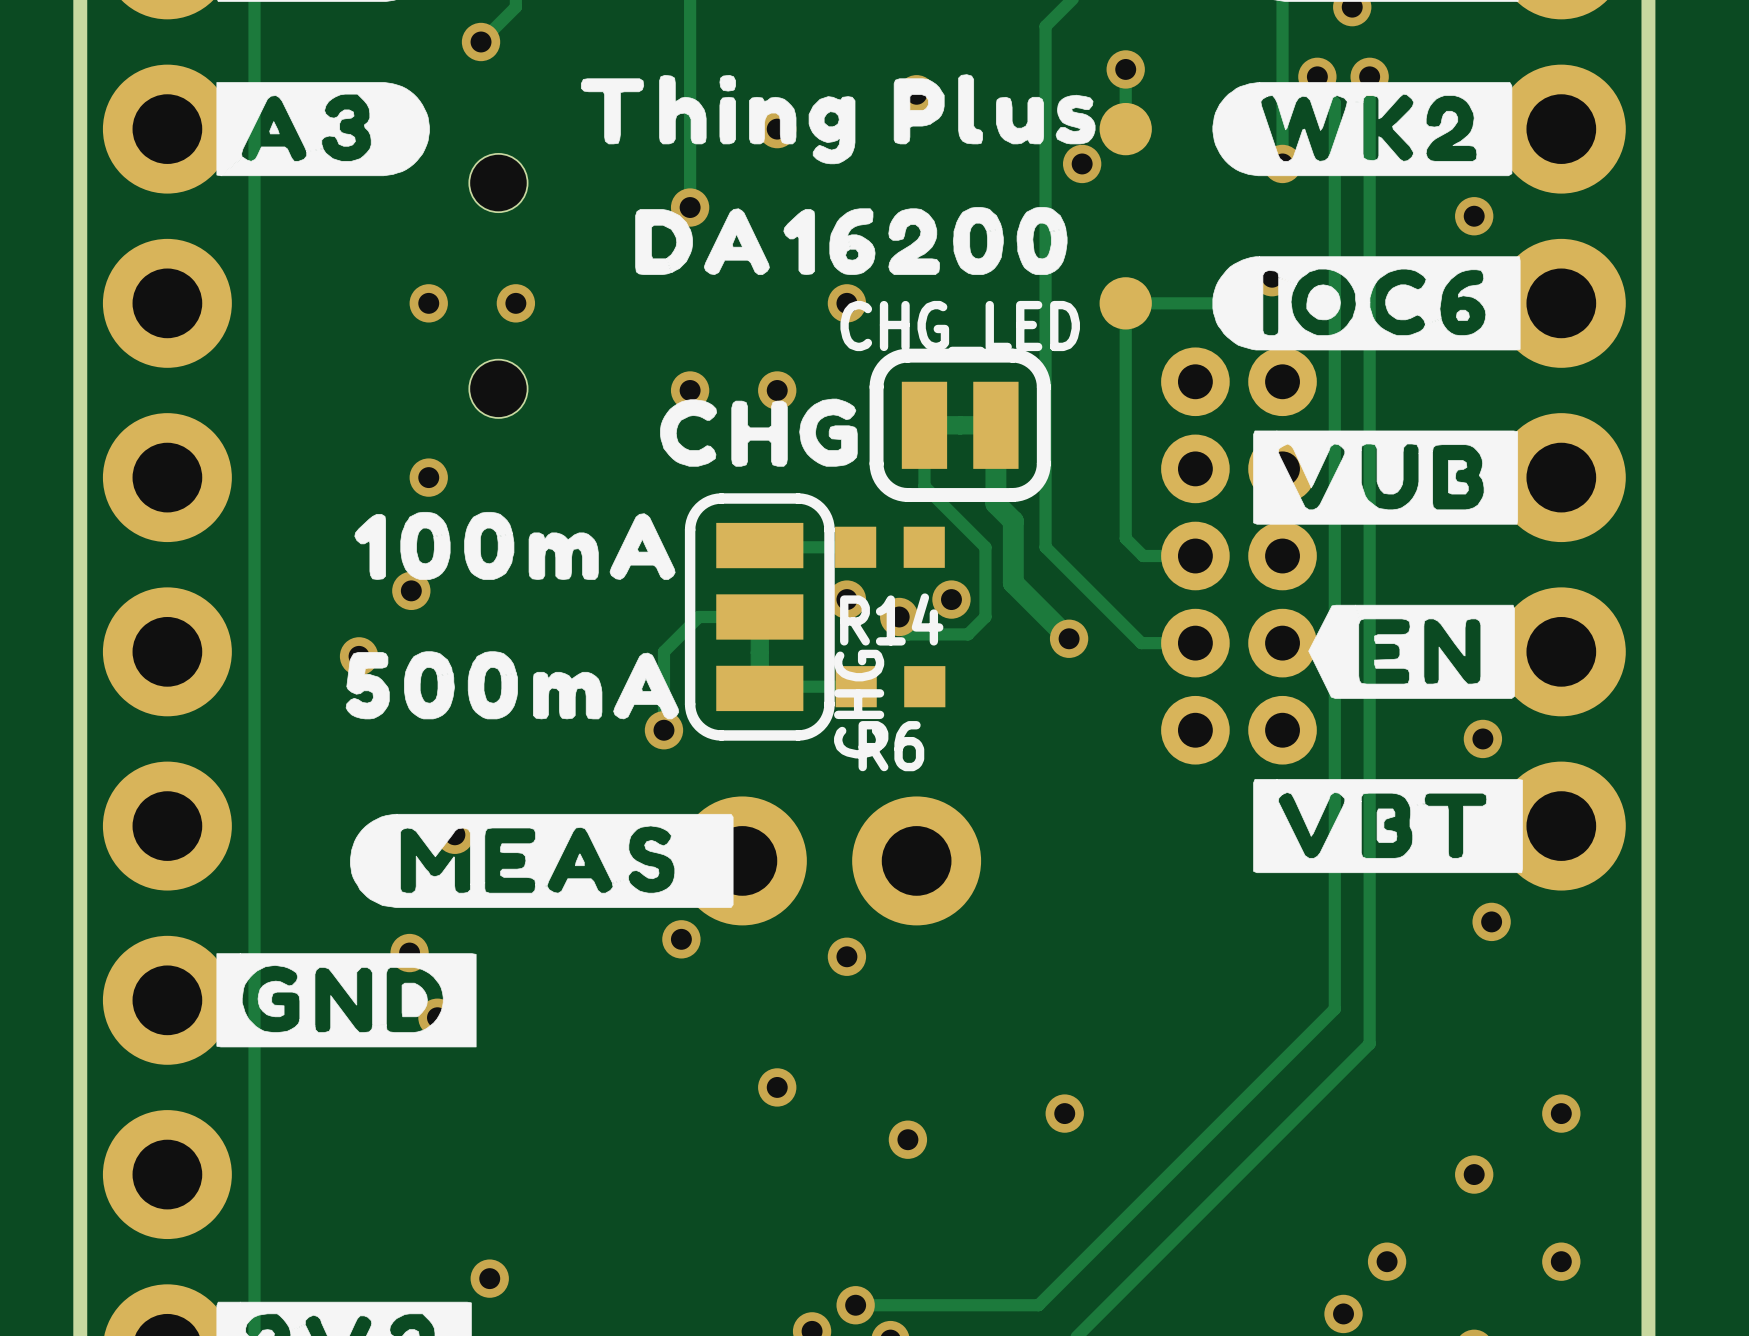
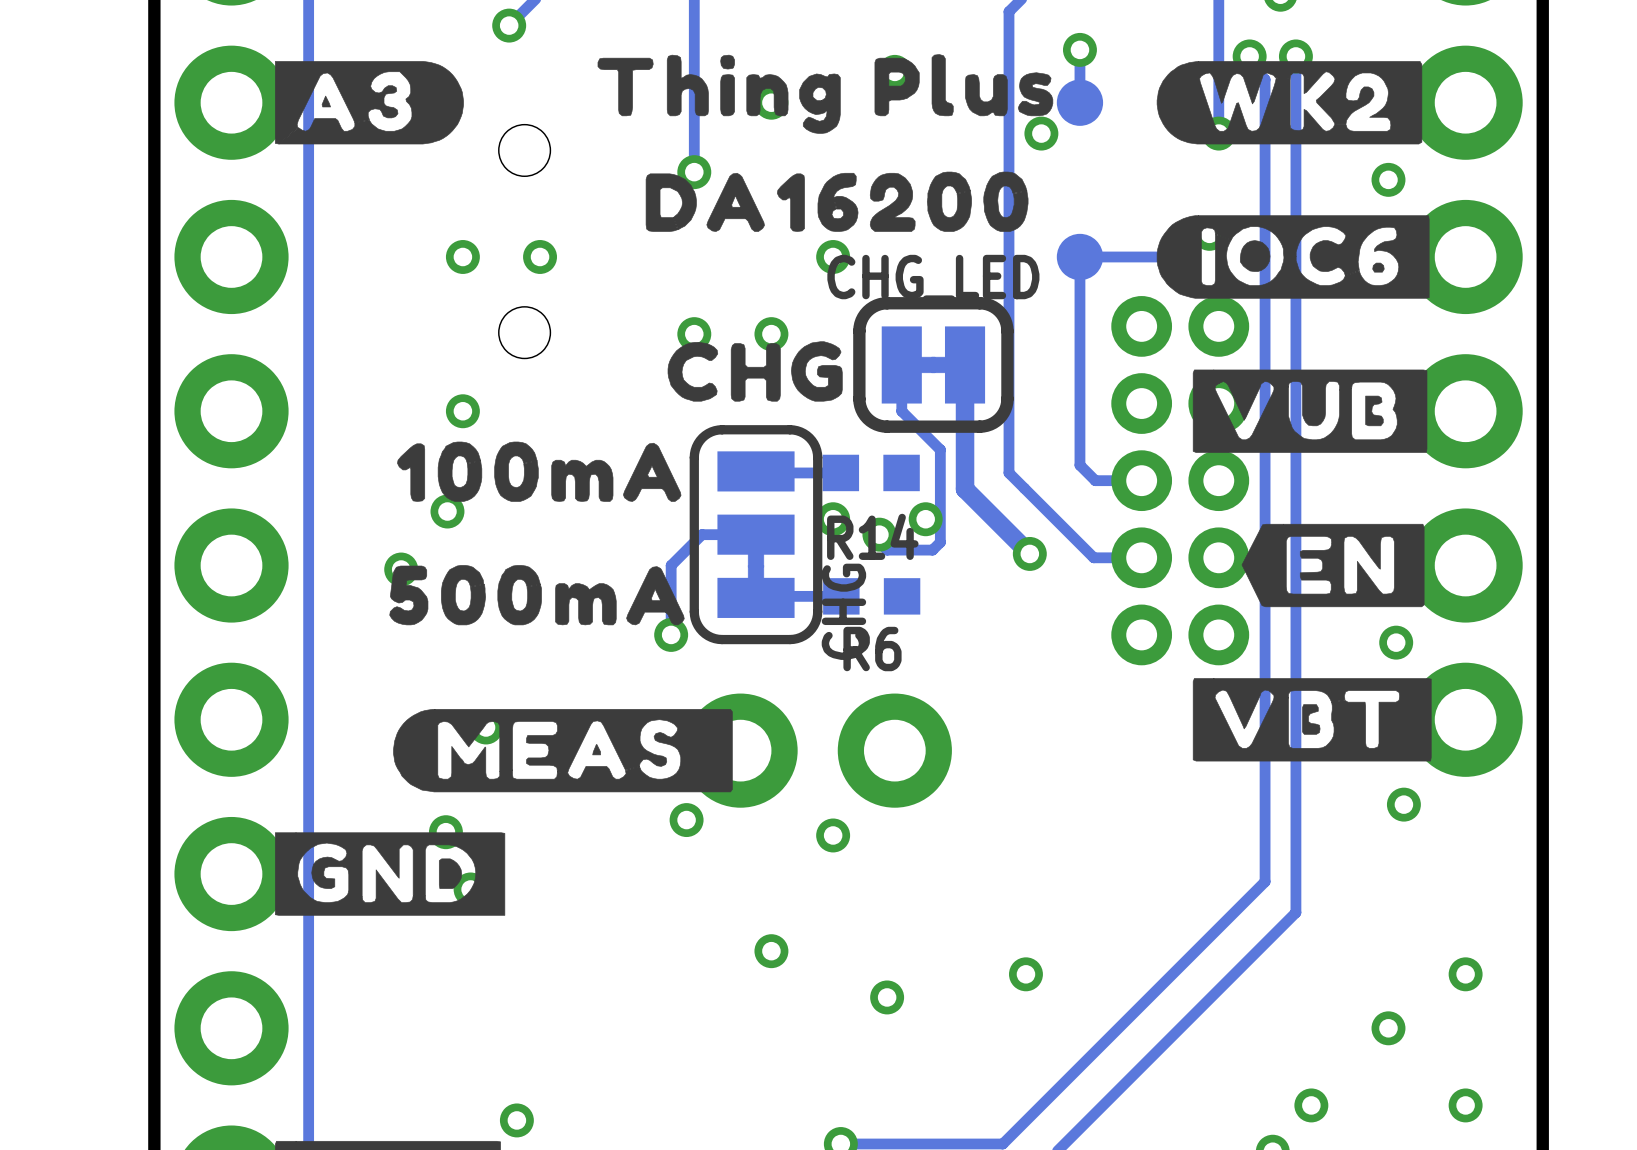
track: (924, 477) (924, 486) (985, 547) (985, 616) (968, 634) (959, 634) -> (901, 411) (940, 449) (940, 542) (932, 550)
track: (995, 503) (1013, 521) (1013, 583) -> (965, 434) (965, 489) (980, 504)

